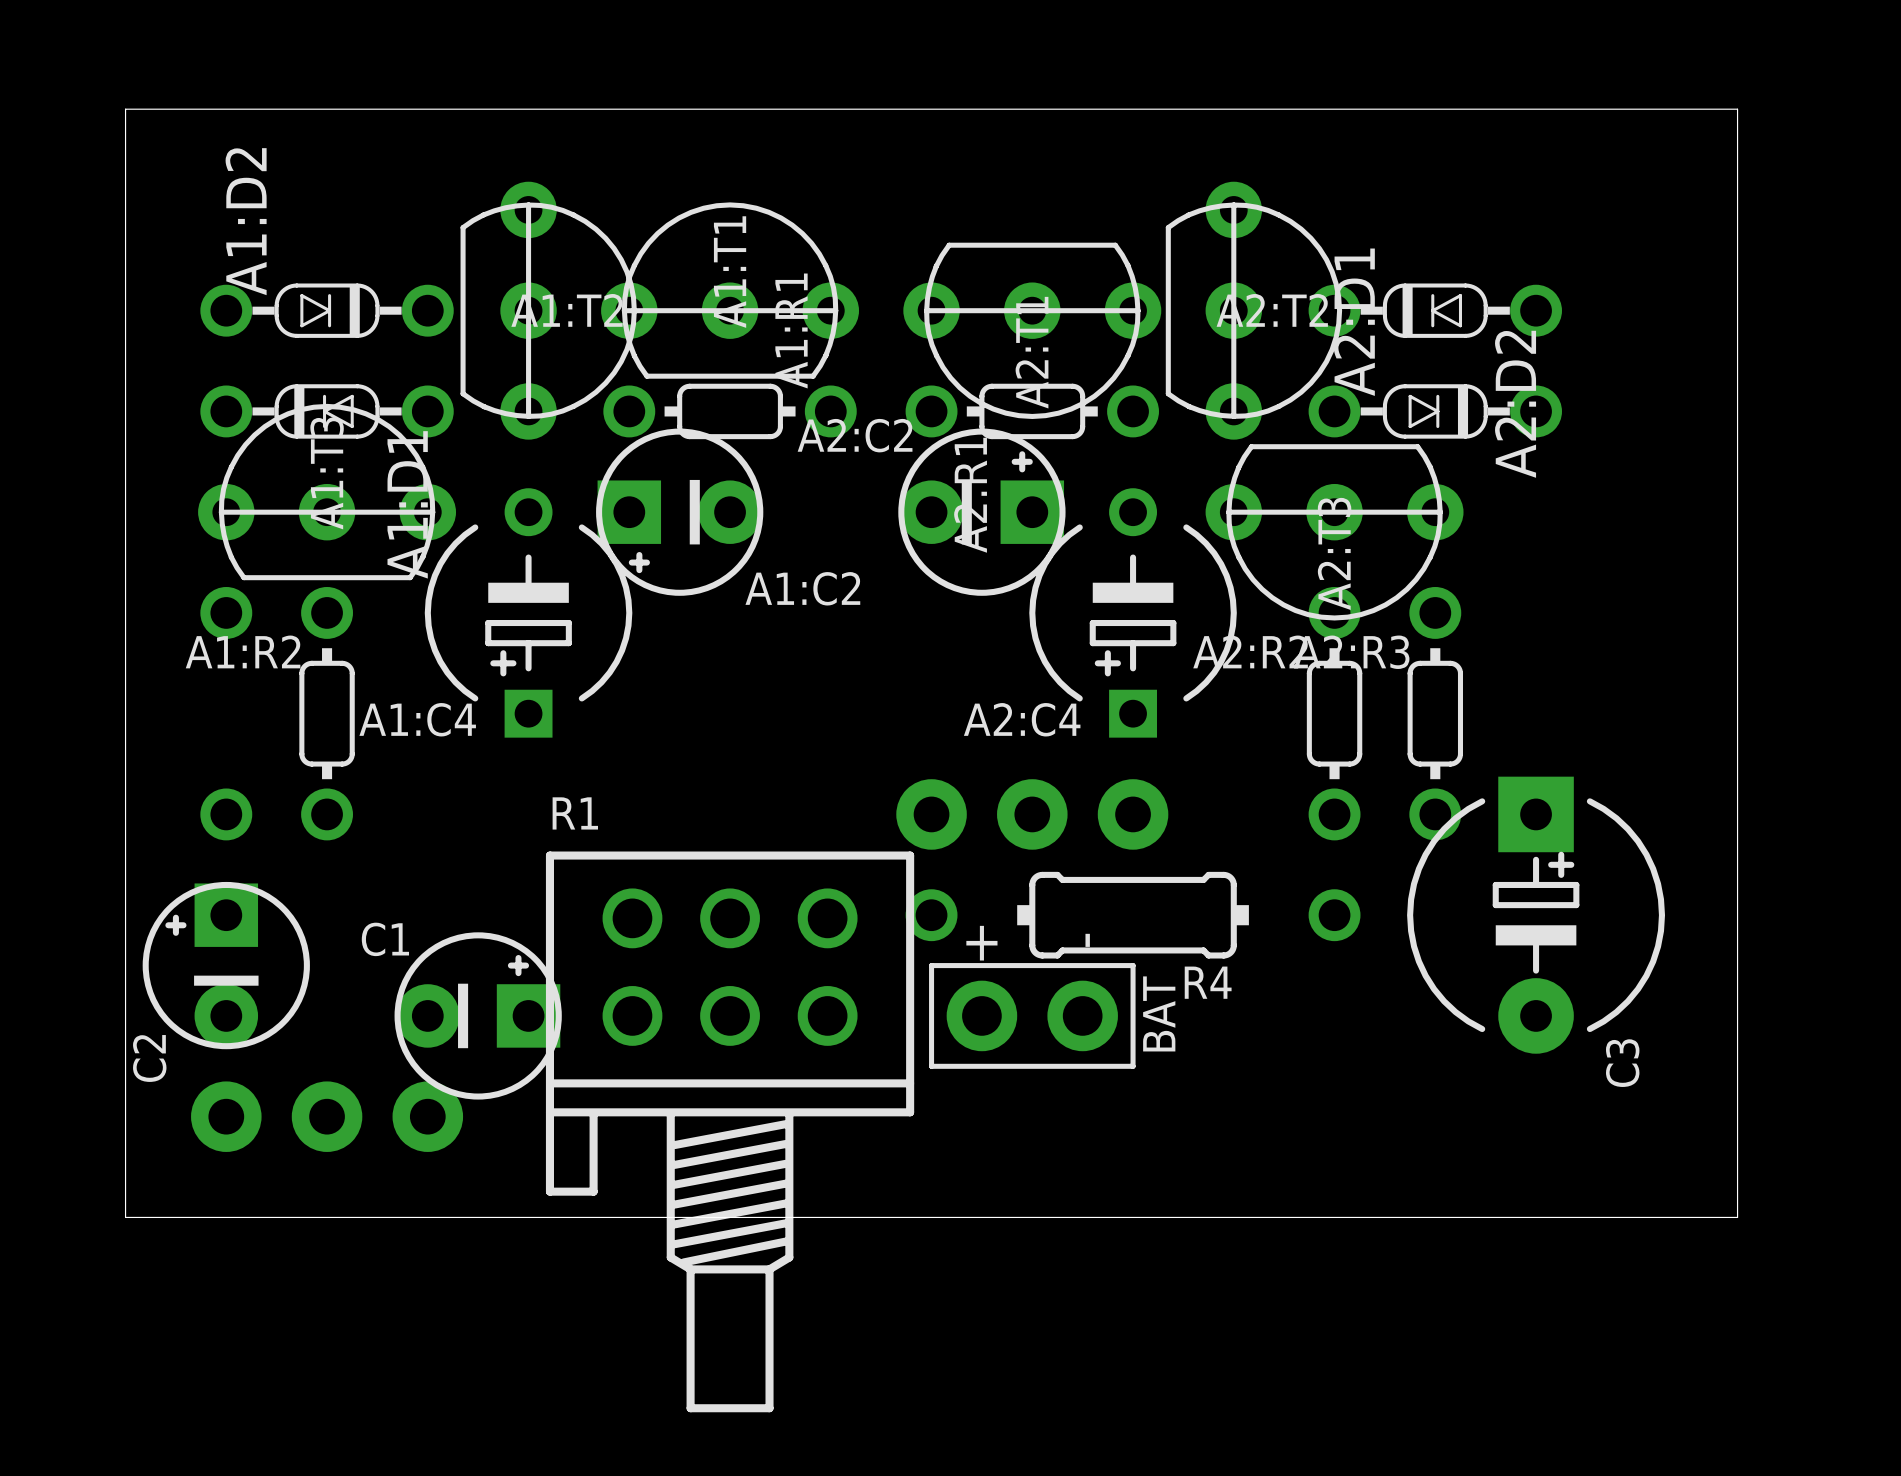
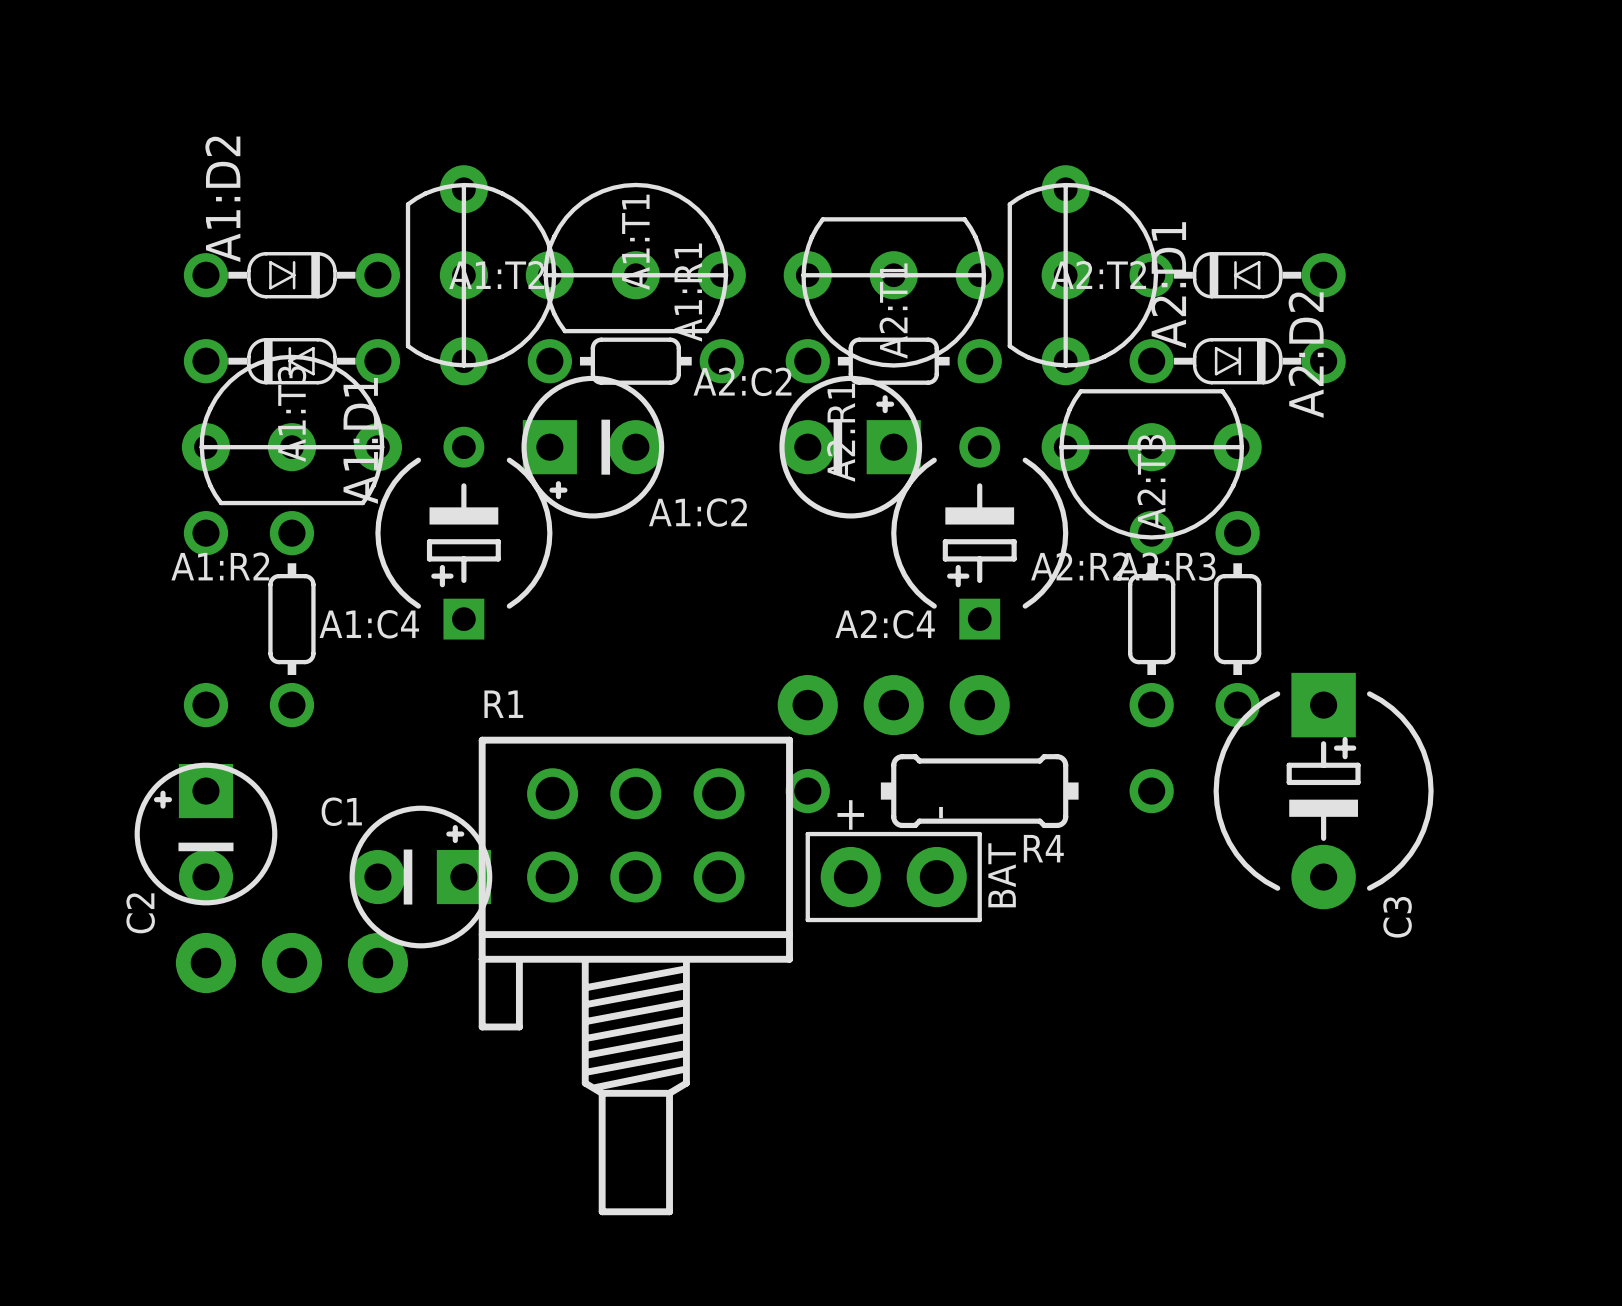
board edge: (125, 109) (1737, 109) (1737, 1217) (125, 1217) (125, 109) -> none

